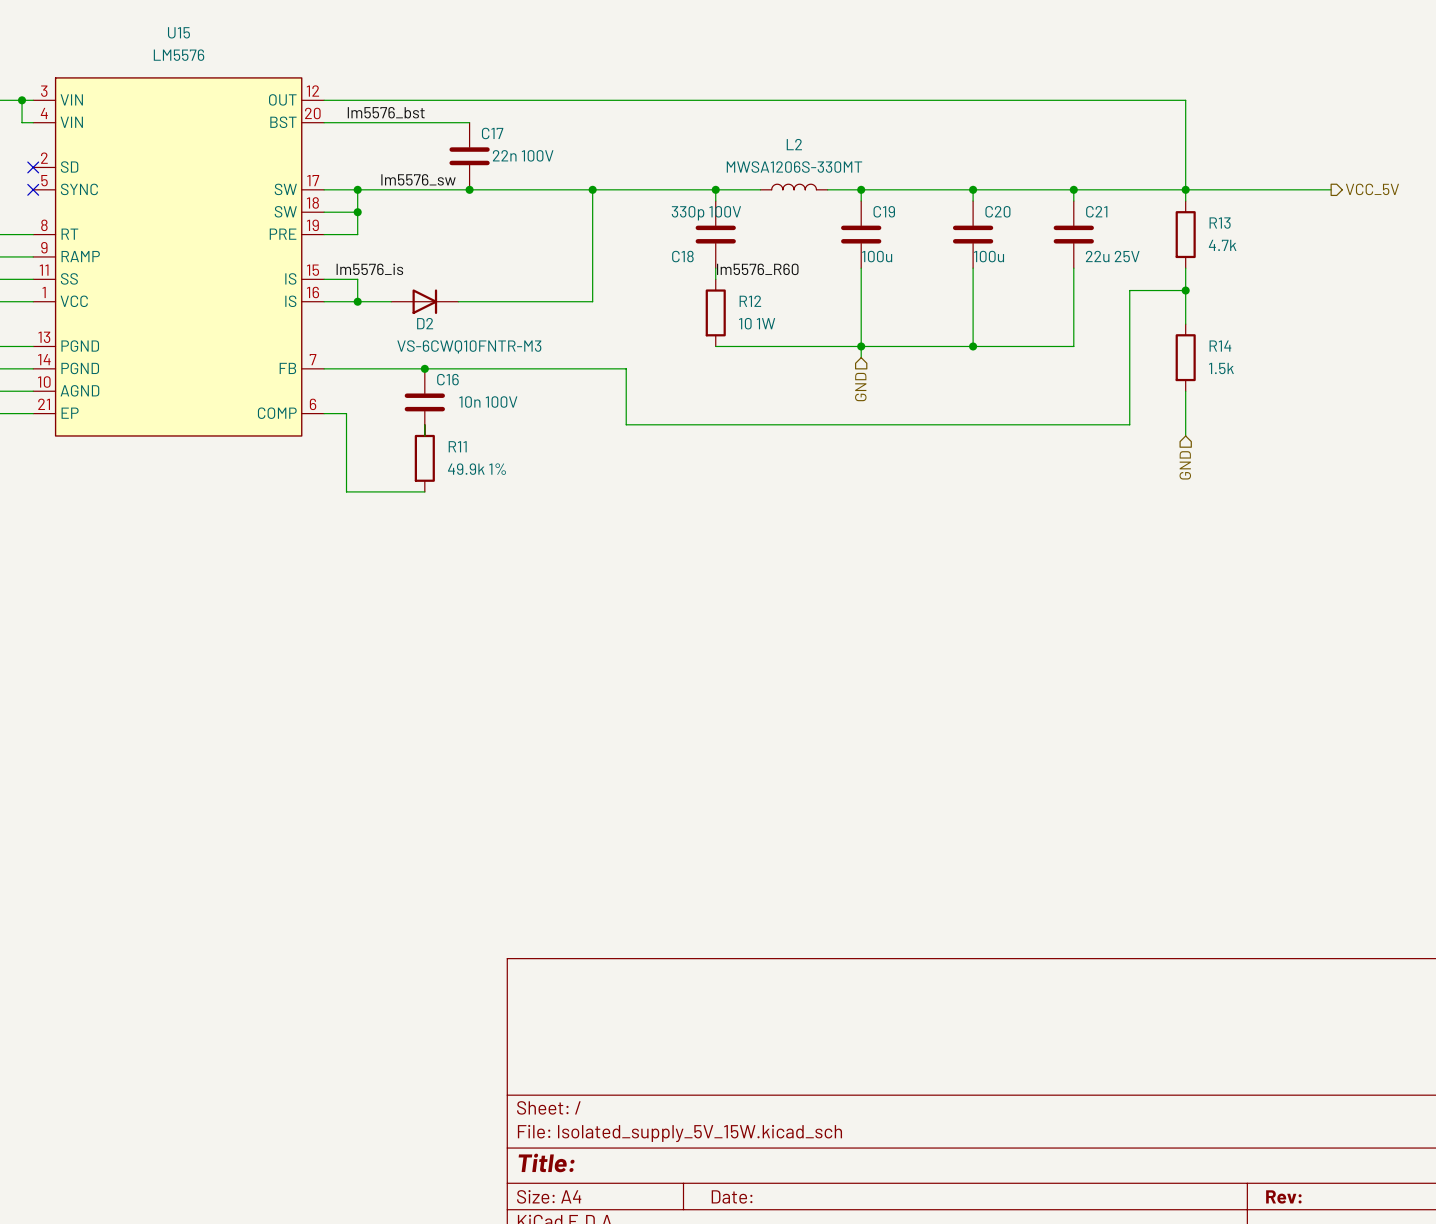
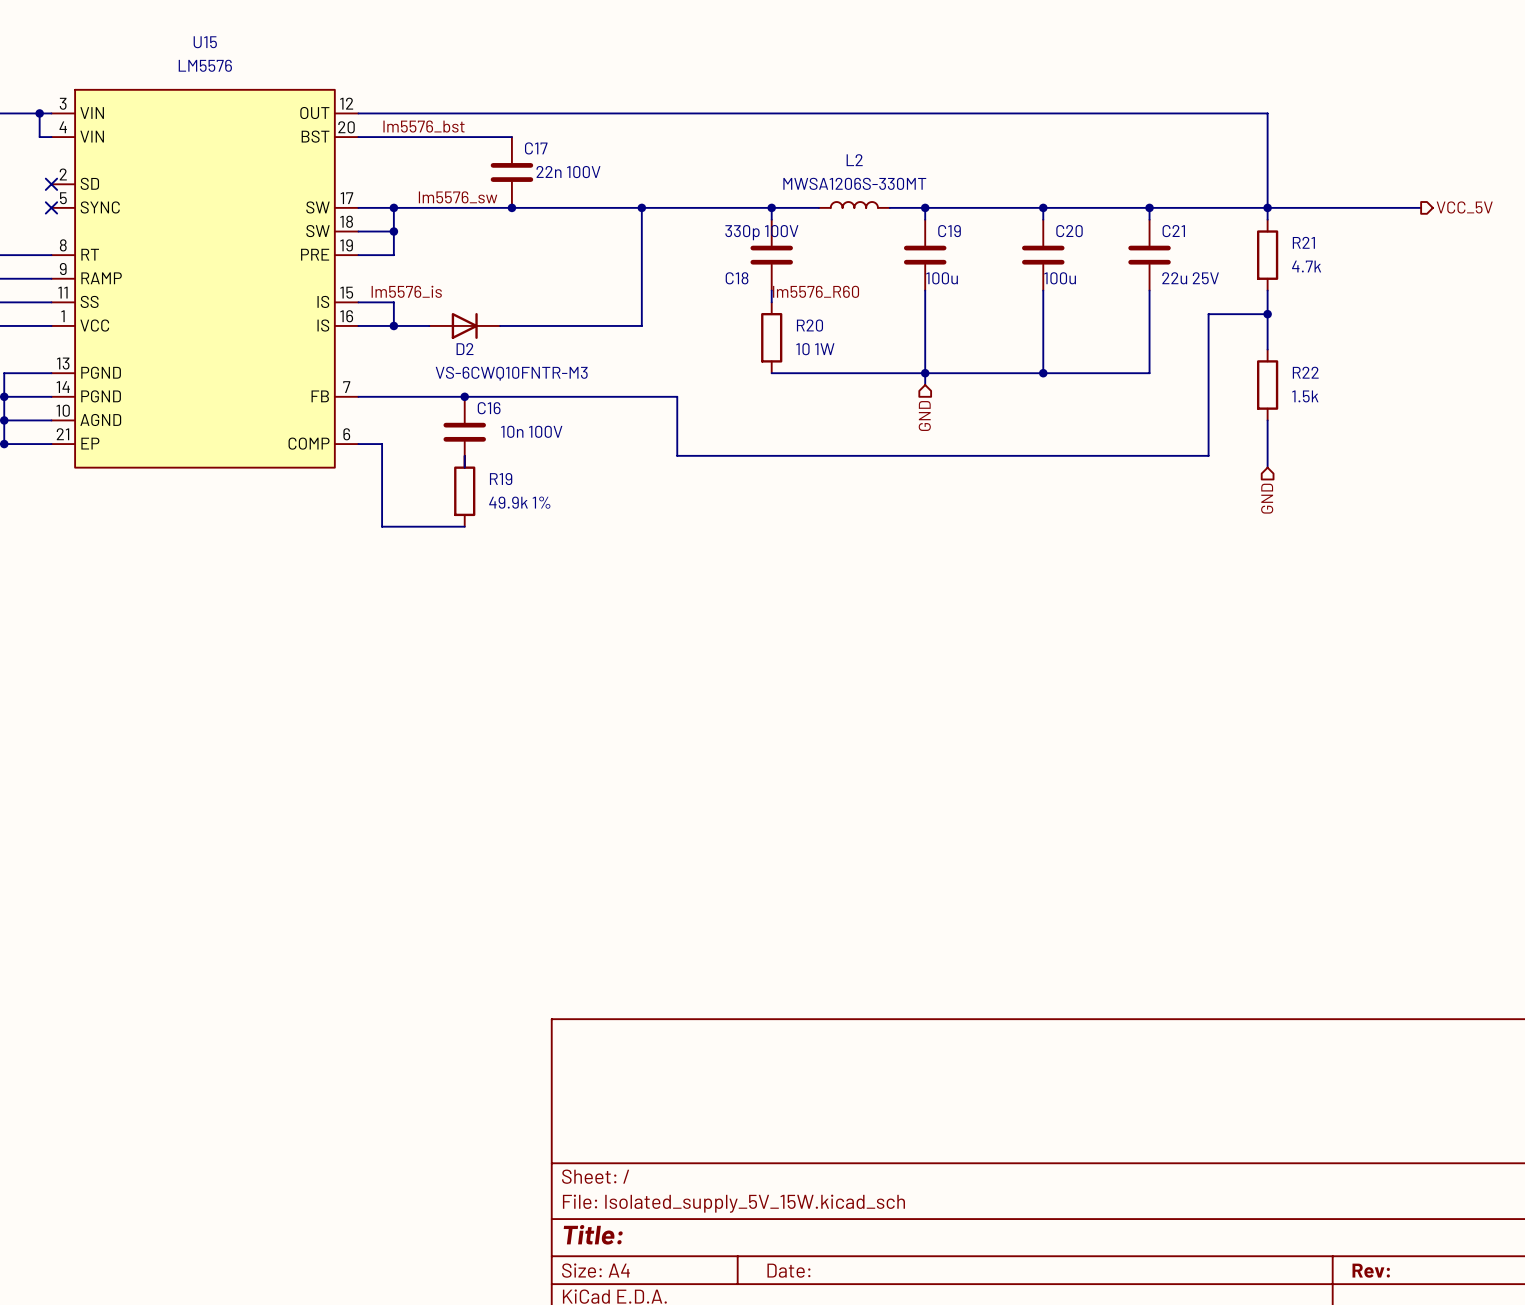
R13 name: R13 (1220, 223) -> R21 (1303, 242)
R12 name: R12 (750, 301) -> R20 (809, 325)
R14 name: R14 (1220, 346) -> R22 (1305, 372)
R11 name: R11 (457, 446) -> R19 (501, 479)

